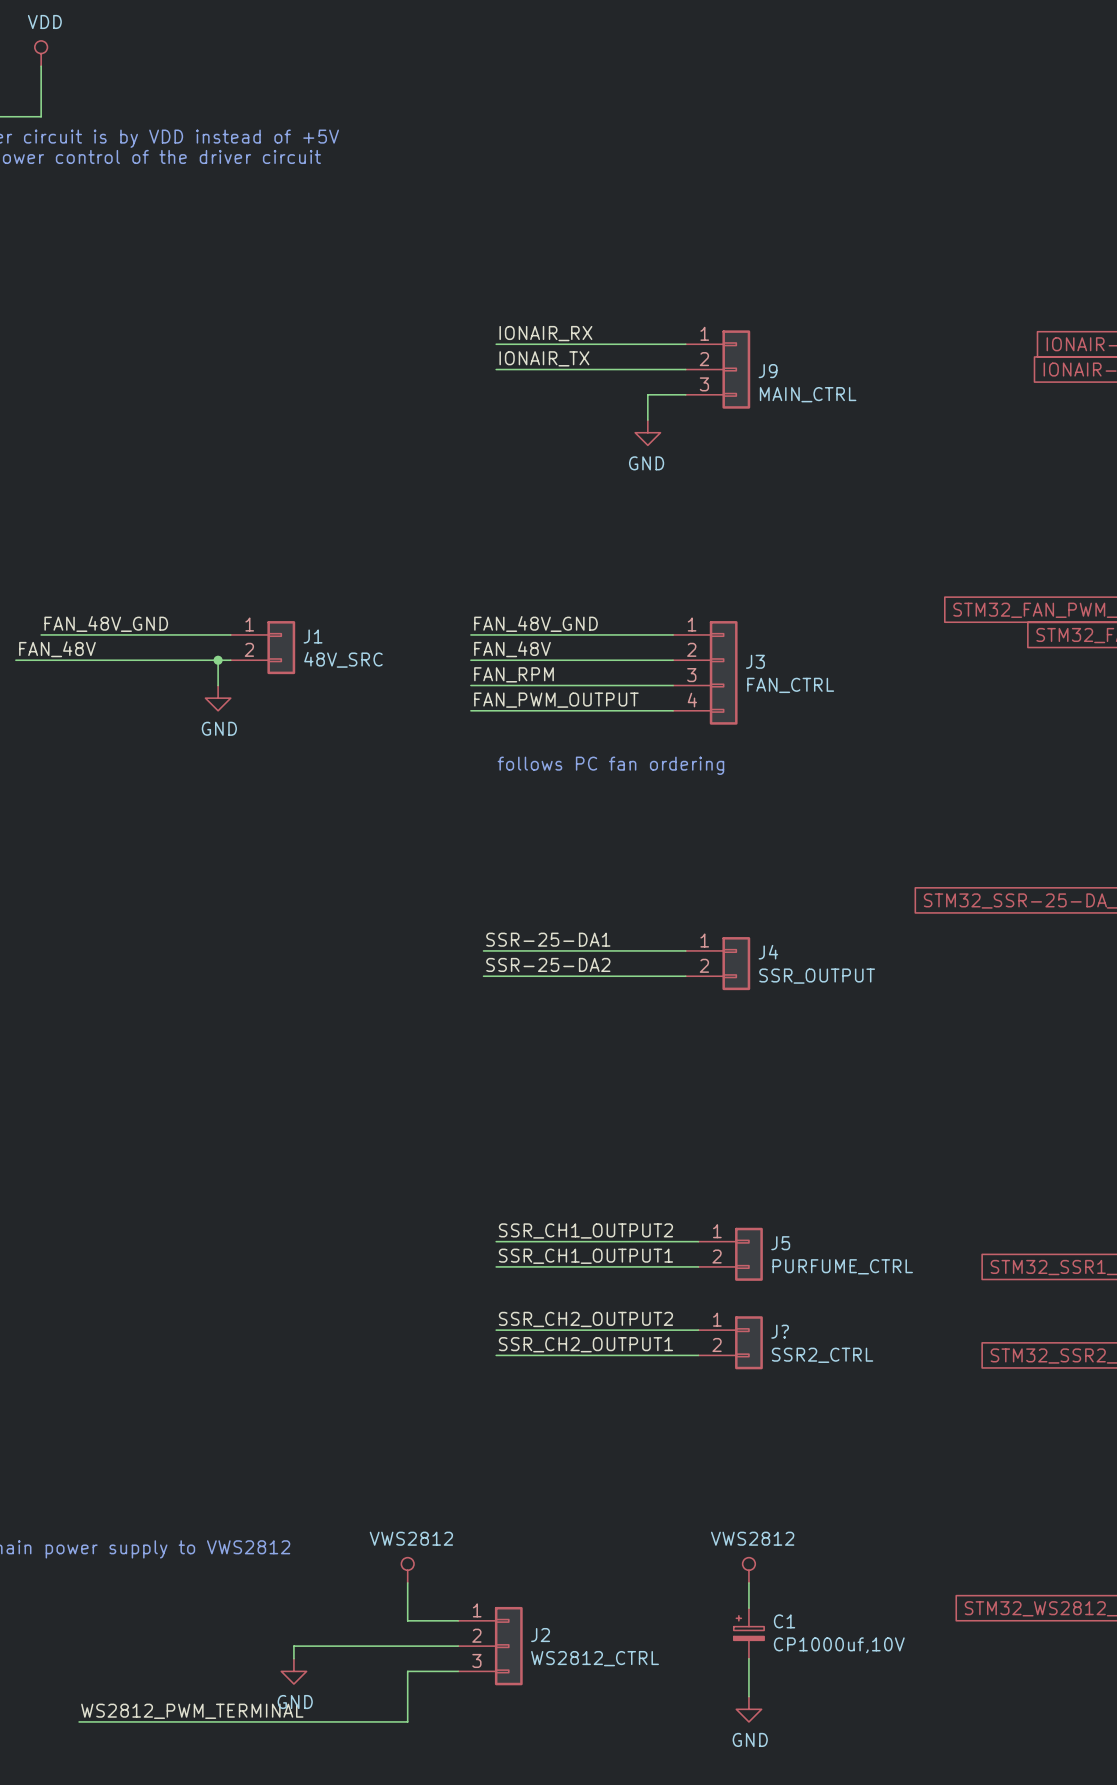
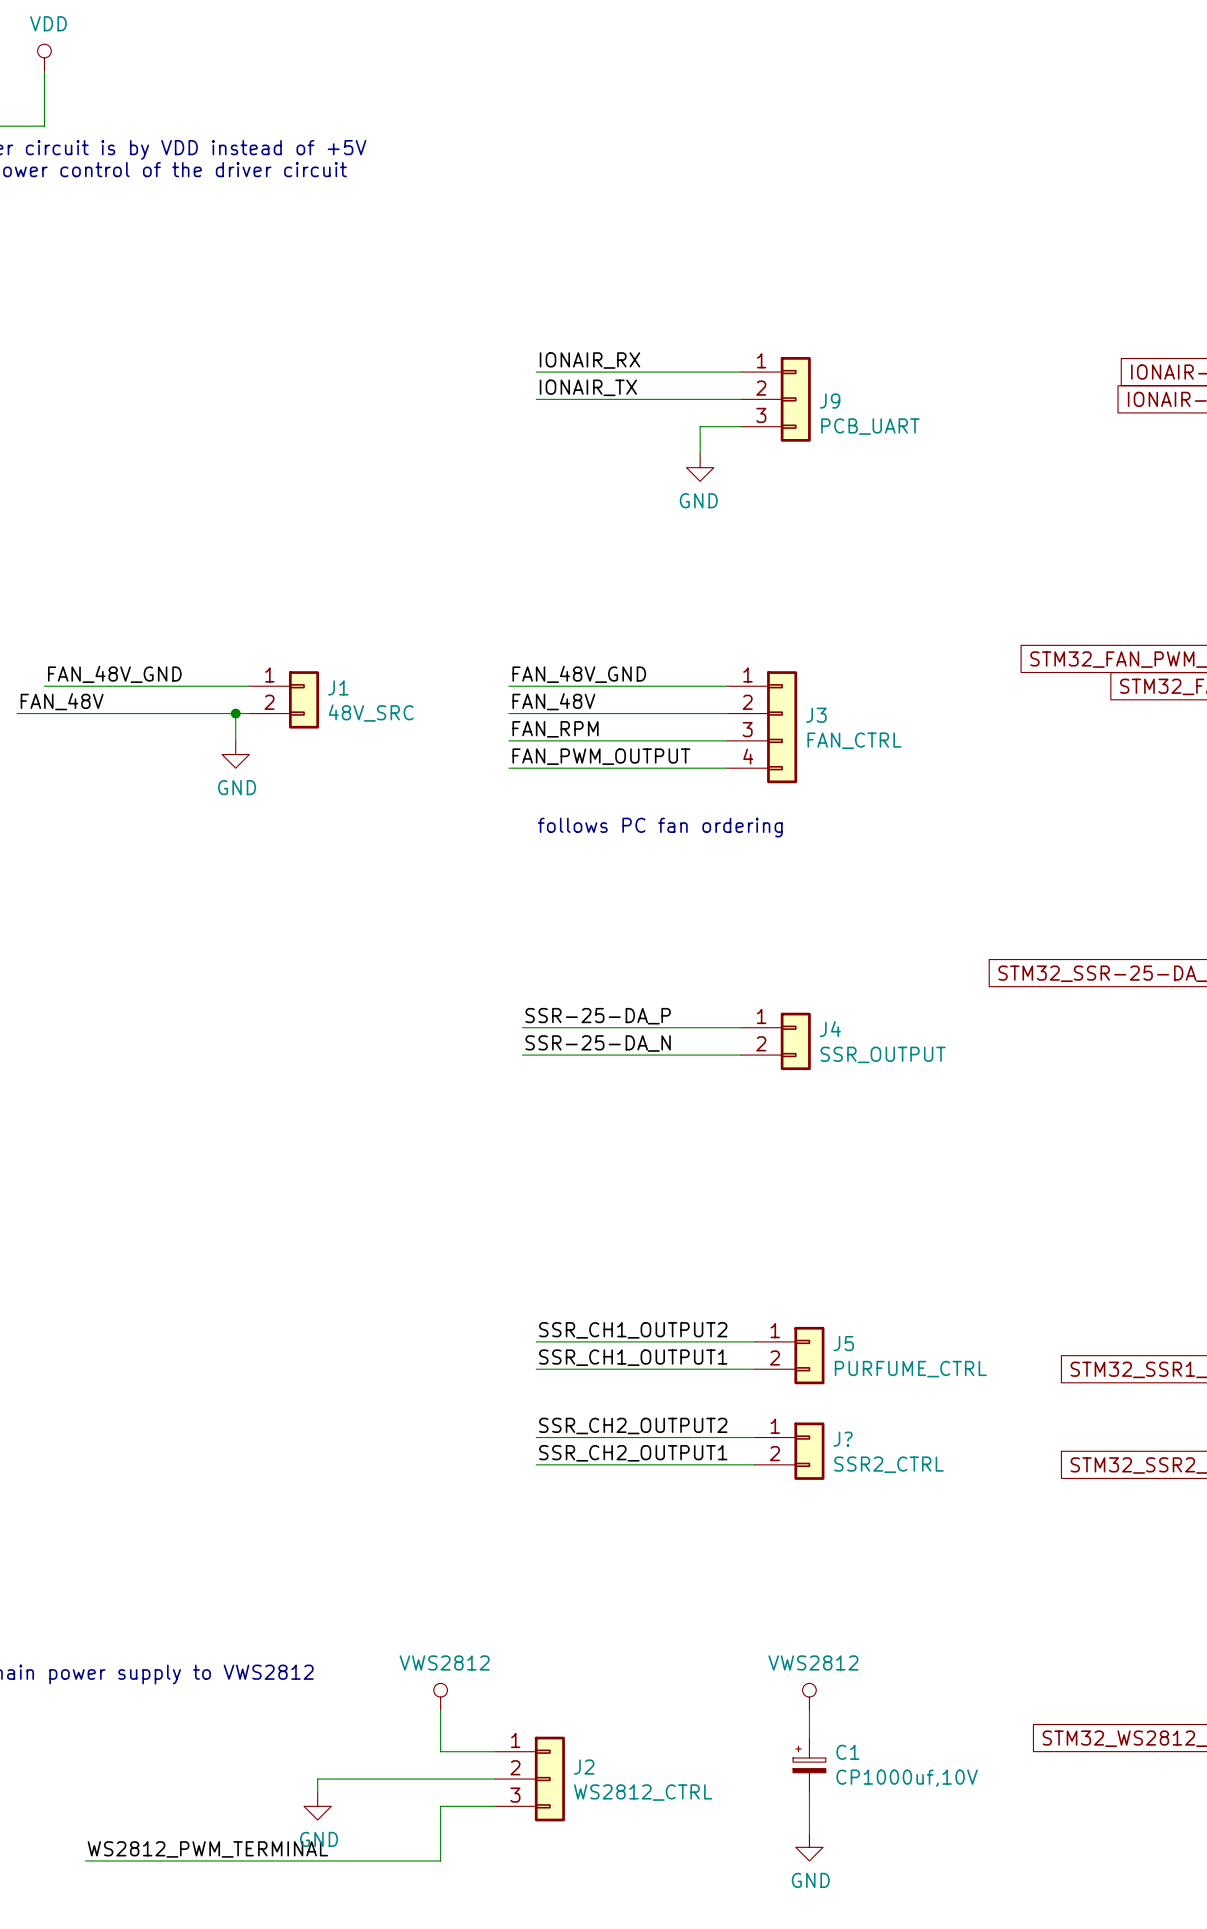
J9 value: MAIN_CTRL (808, 394) -> PCB_UART (870, 426)
label: SSR-25-DA1 (548, 939) -> SSR-25-DA_P (598, 1016)
label: SSR-25-DA2 (548, 964) -> SSR-25-DA_N (598, 1043)

